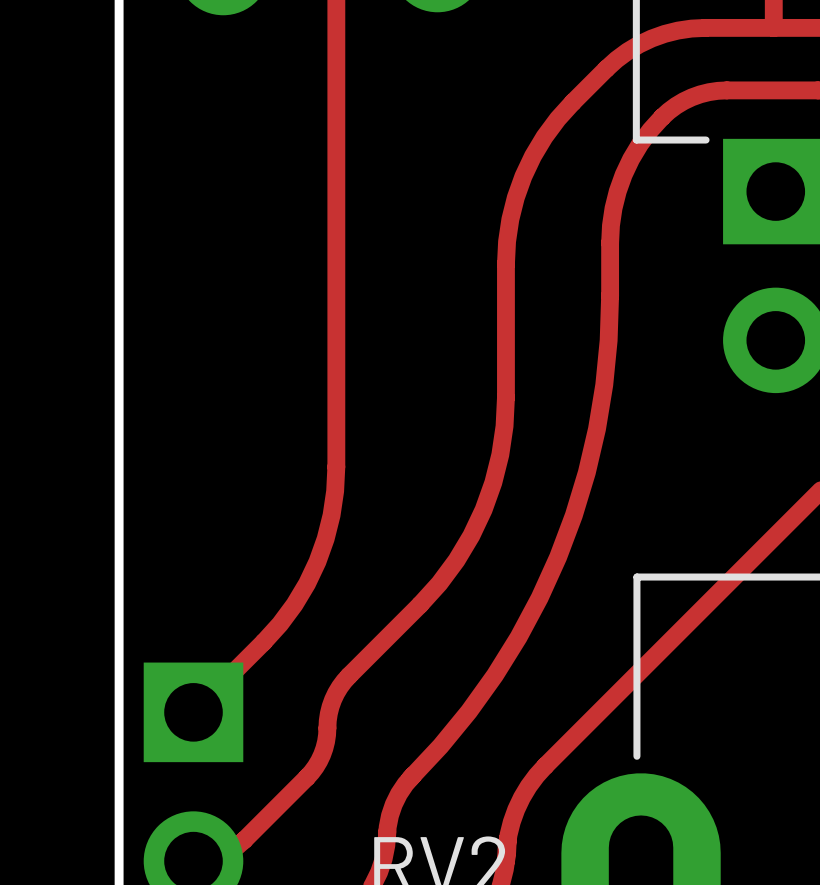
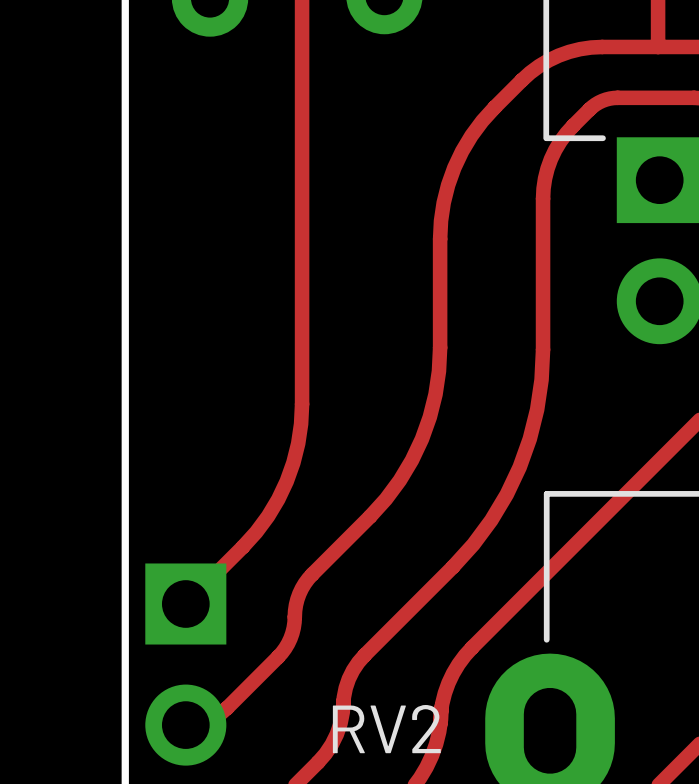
track: (726, 90) (709, 92) (691, 97) (668, 111) (640, 144) (623, 174) (613, 208) (610, 225) (608, 340) (604, 384) (586, 472) (573, 515) (558, 557) (518, 637) (468, 711) (410, 778) -> (619, 97) (602, 100) (589, 109) (560, 141) (547, 168) (543, 198) (541, 379) (529, 438) (519, 467) (506, 494) (473, 544) (364, 655)

